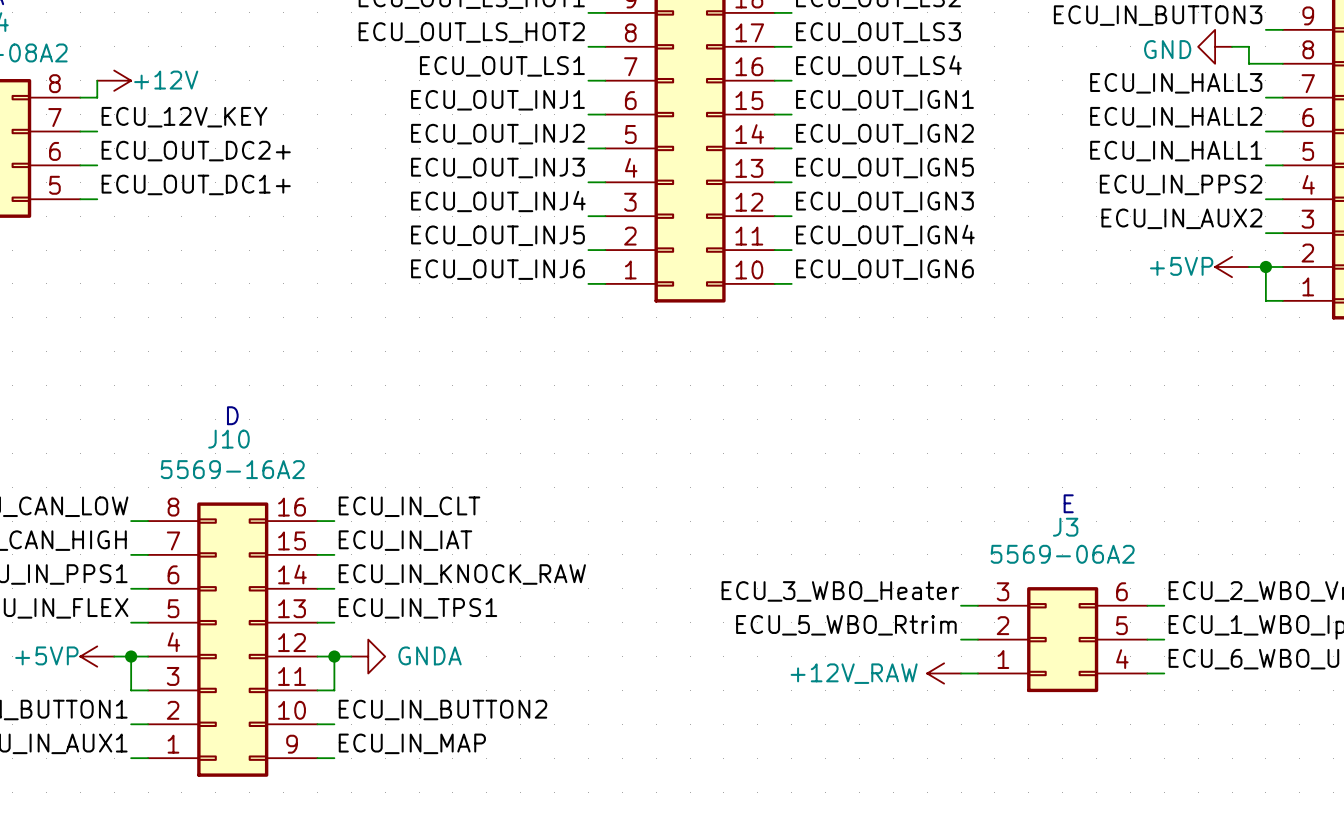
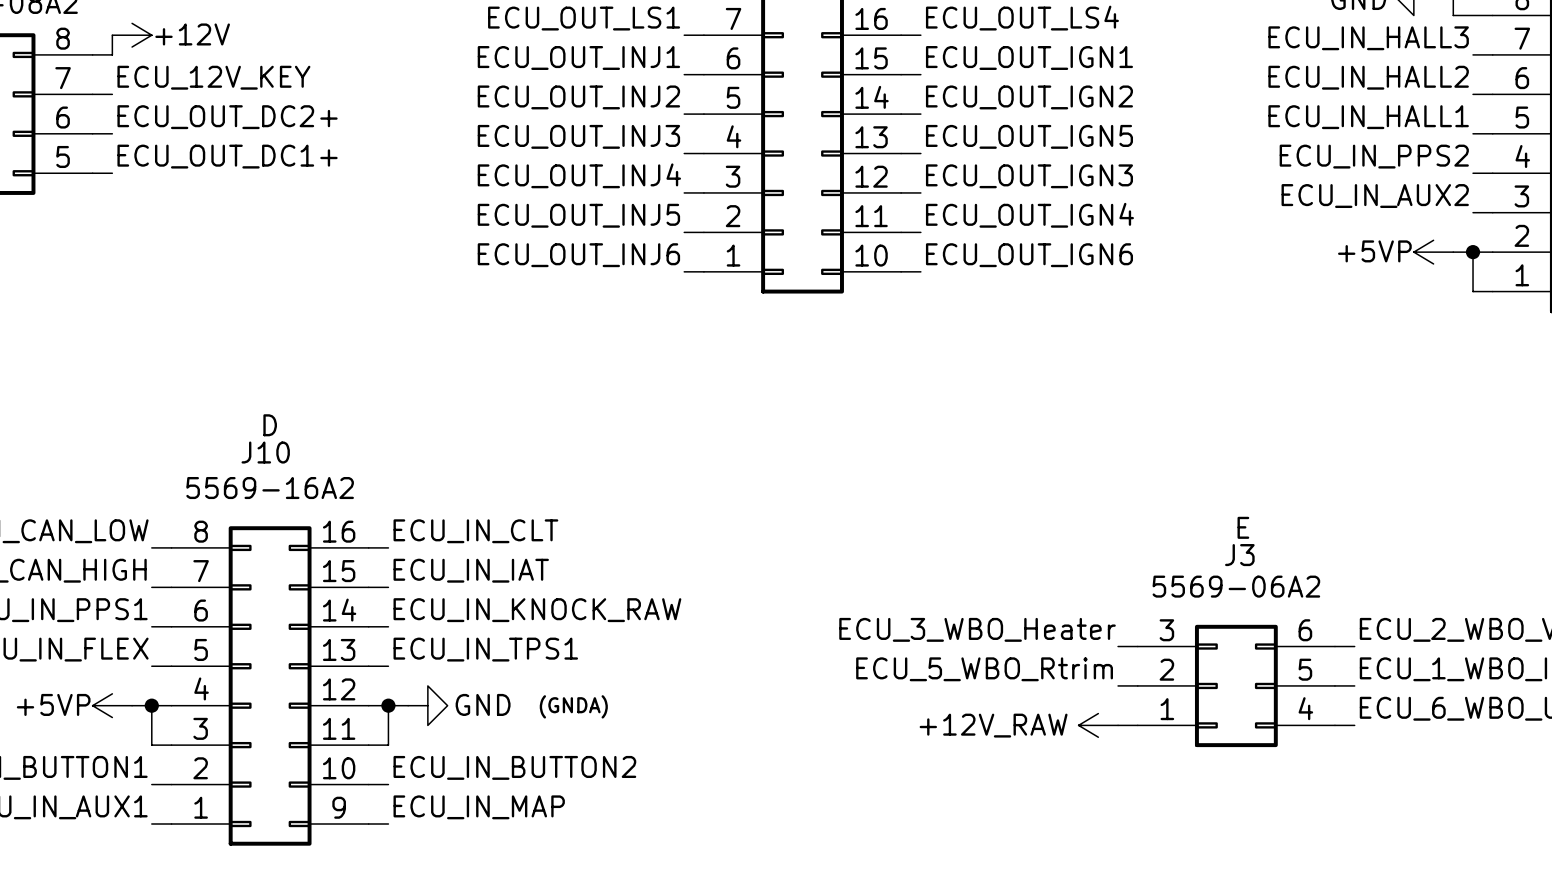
power symbol: GNDA (368, 656) -> GND (427, 705)
text: none -> (GNDA) (573, 706)

